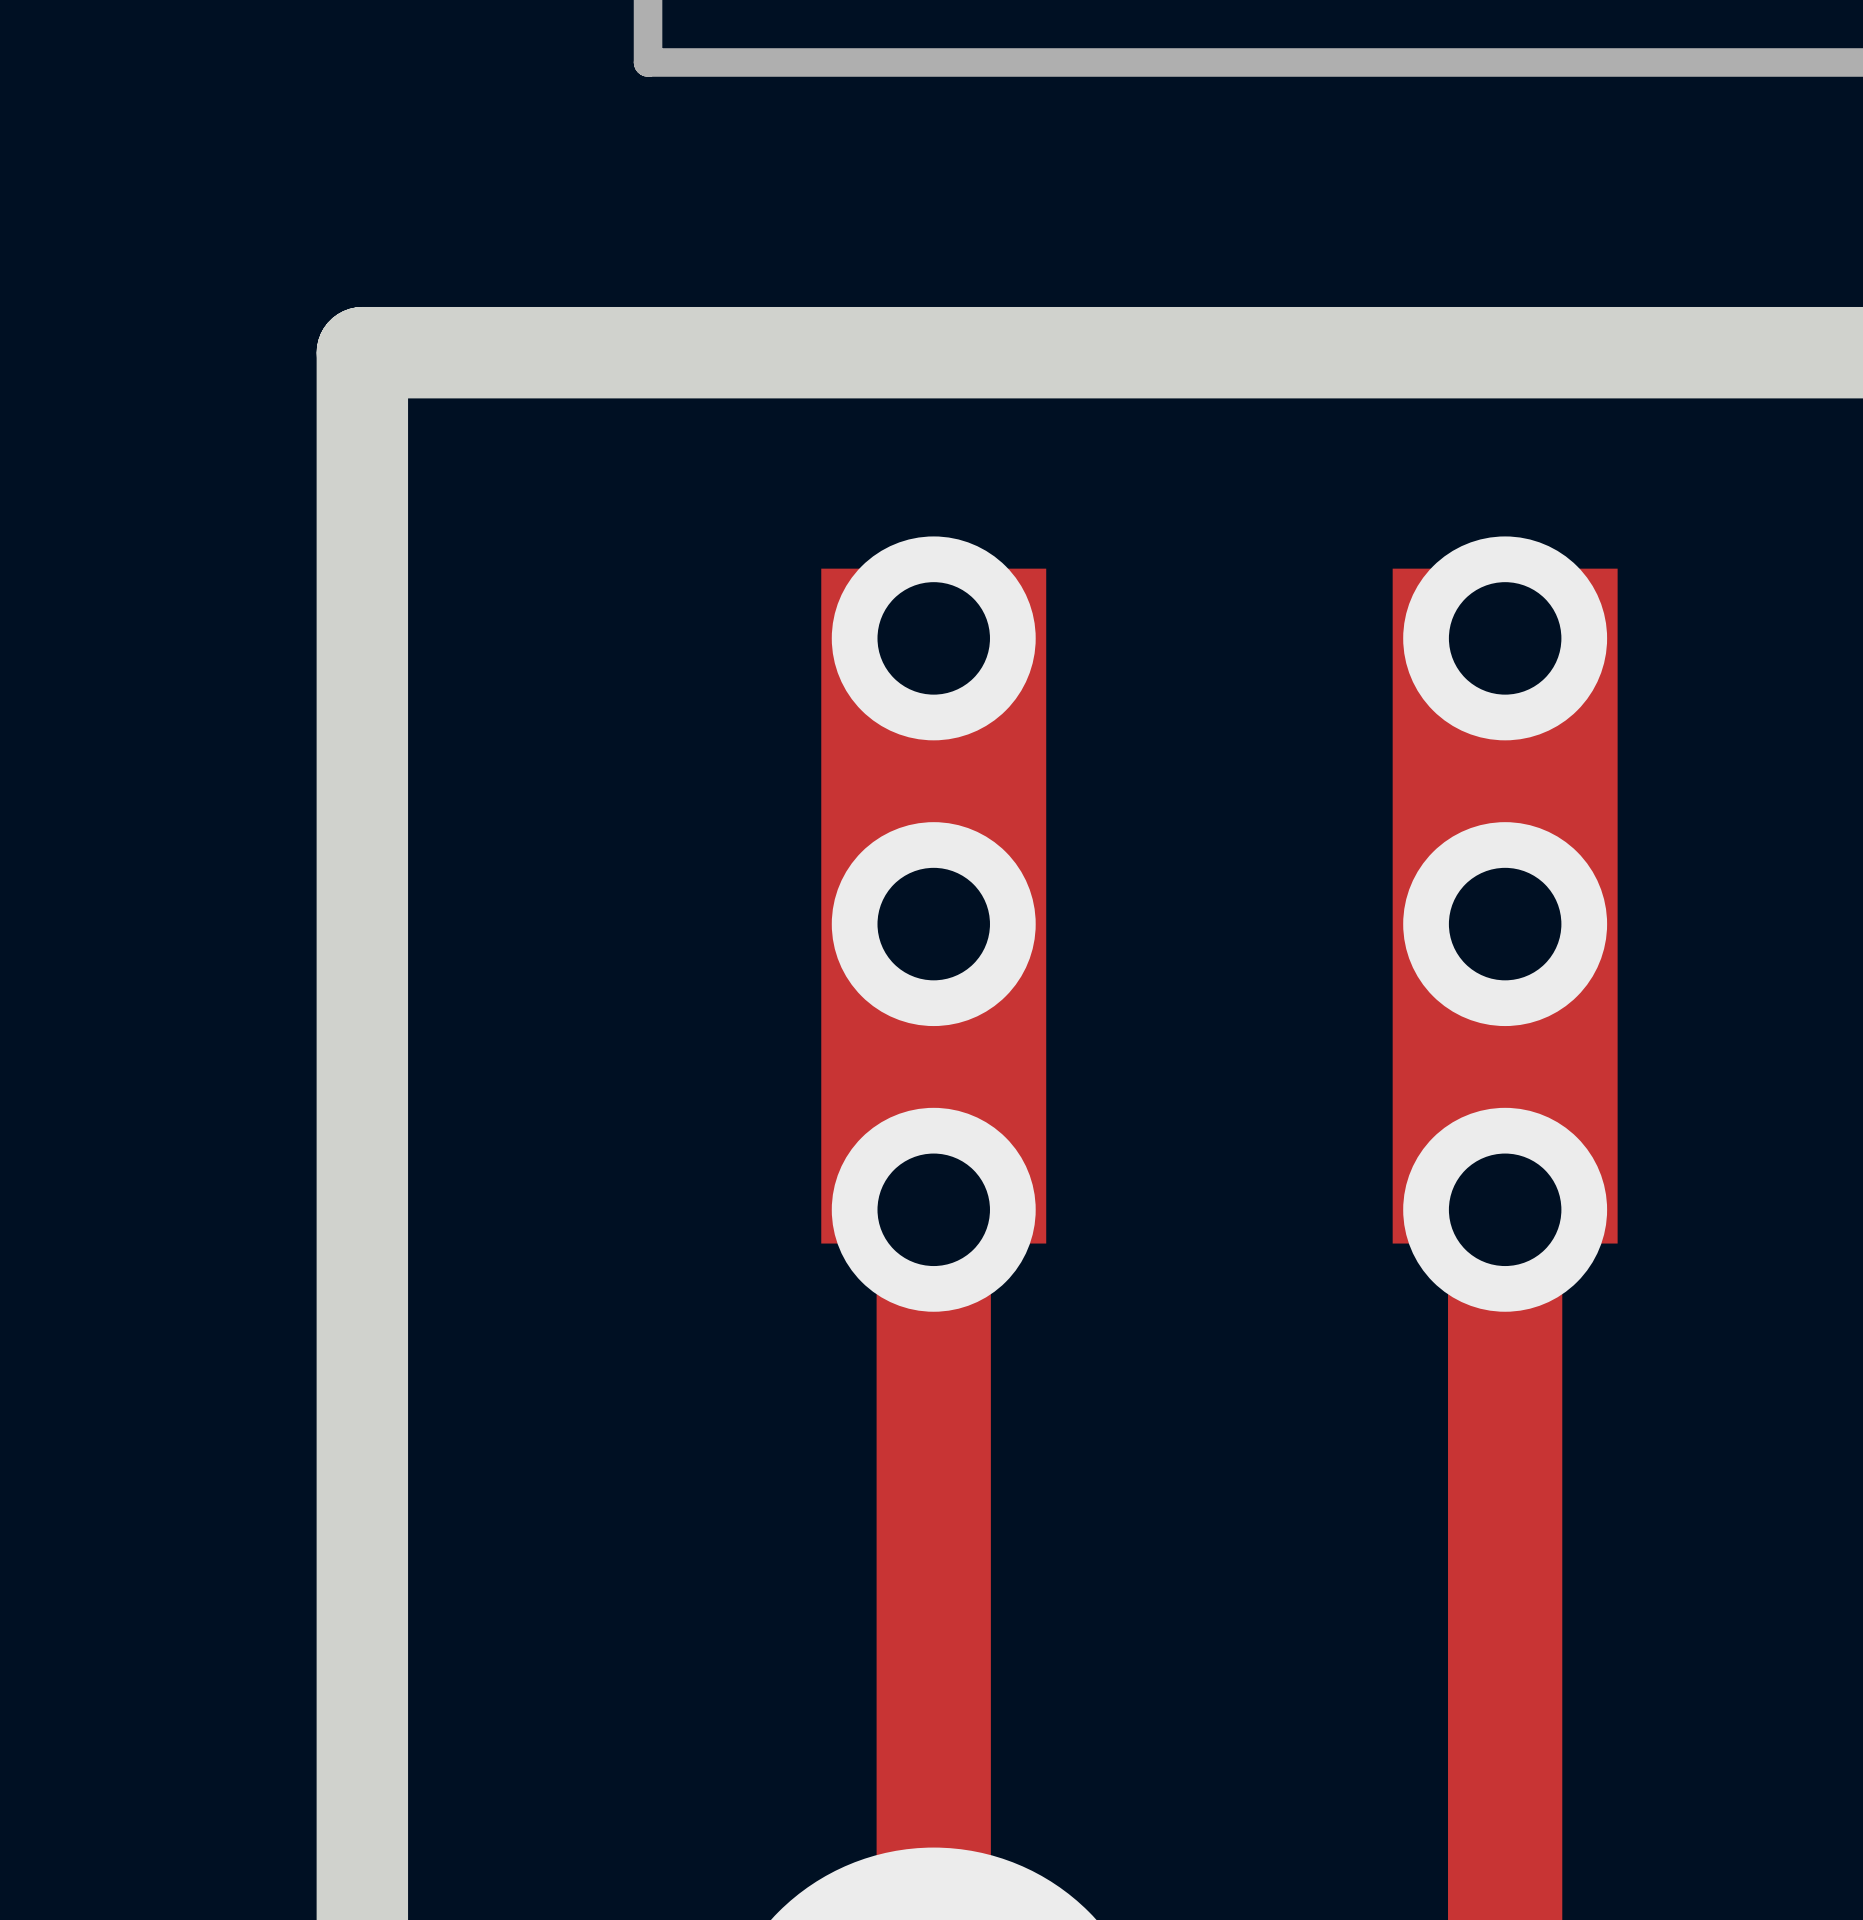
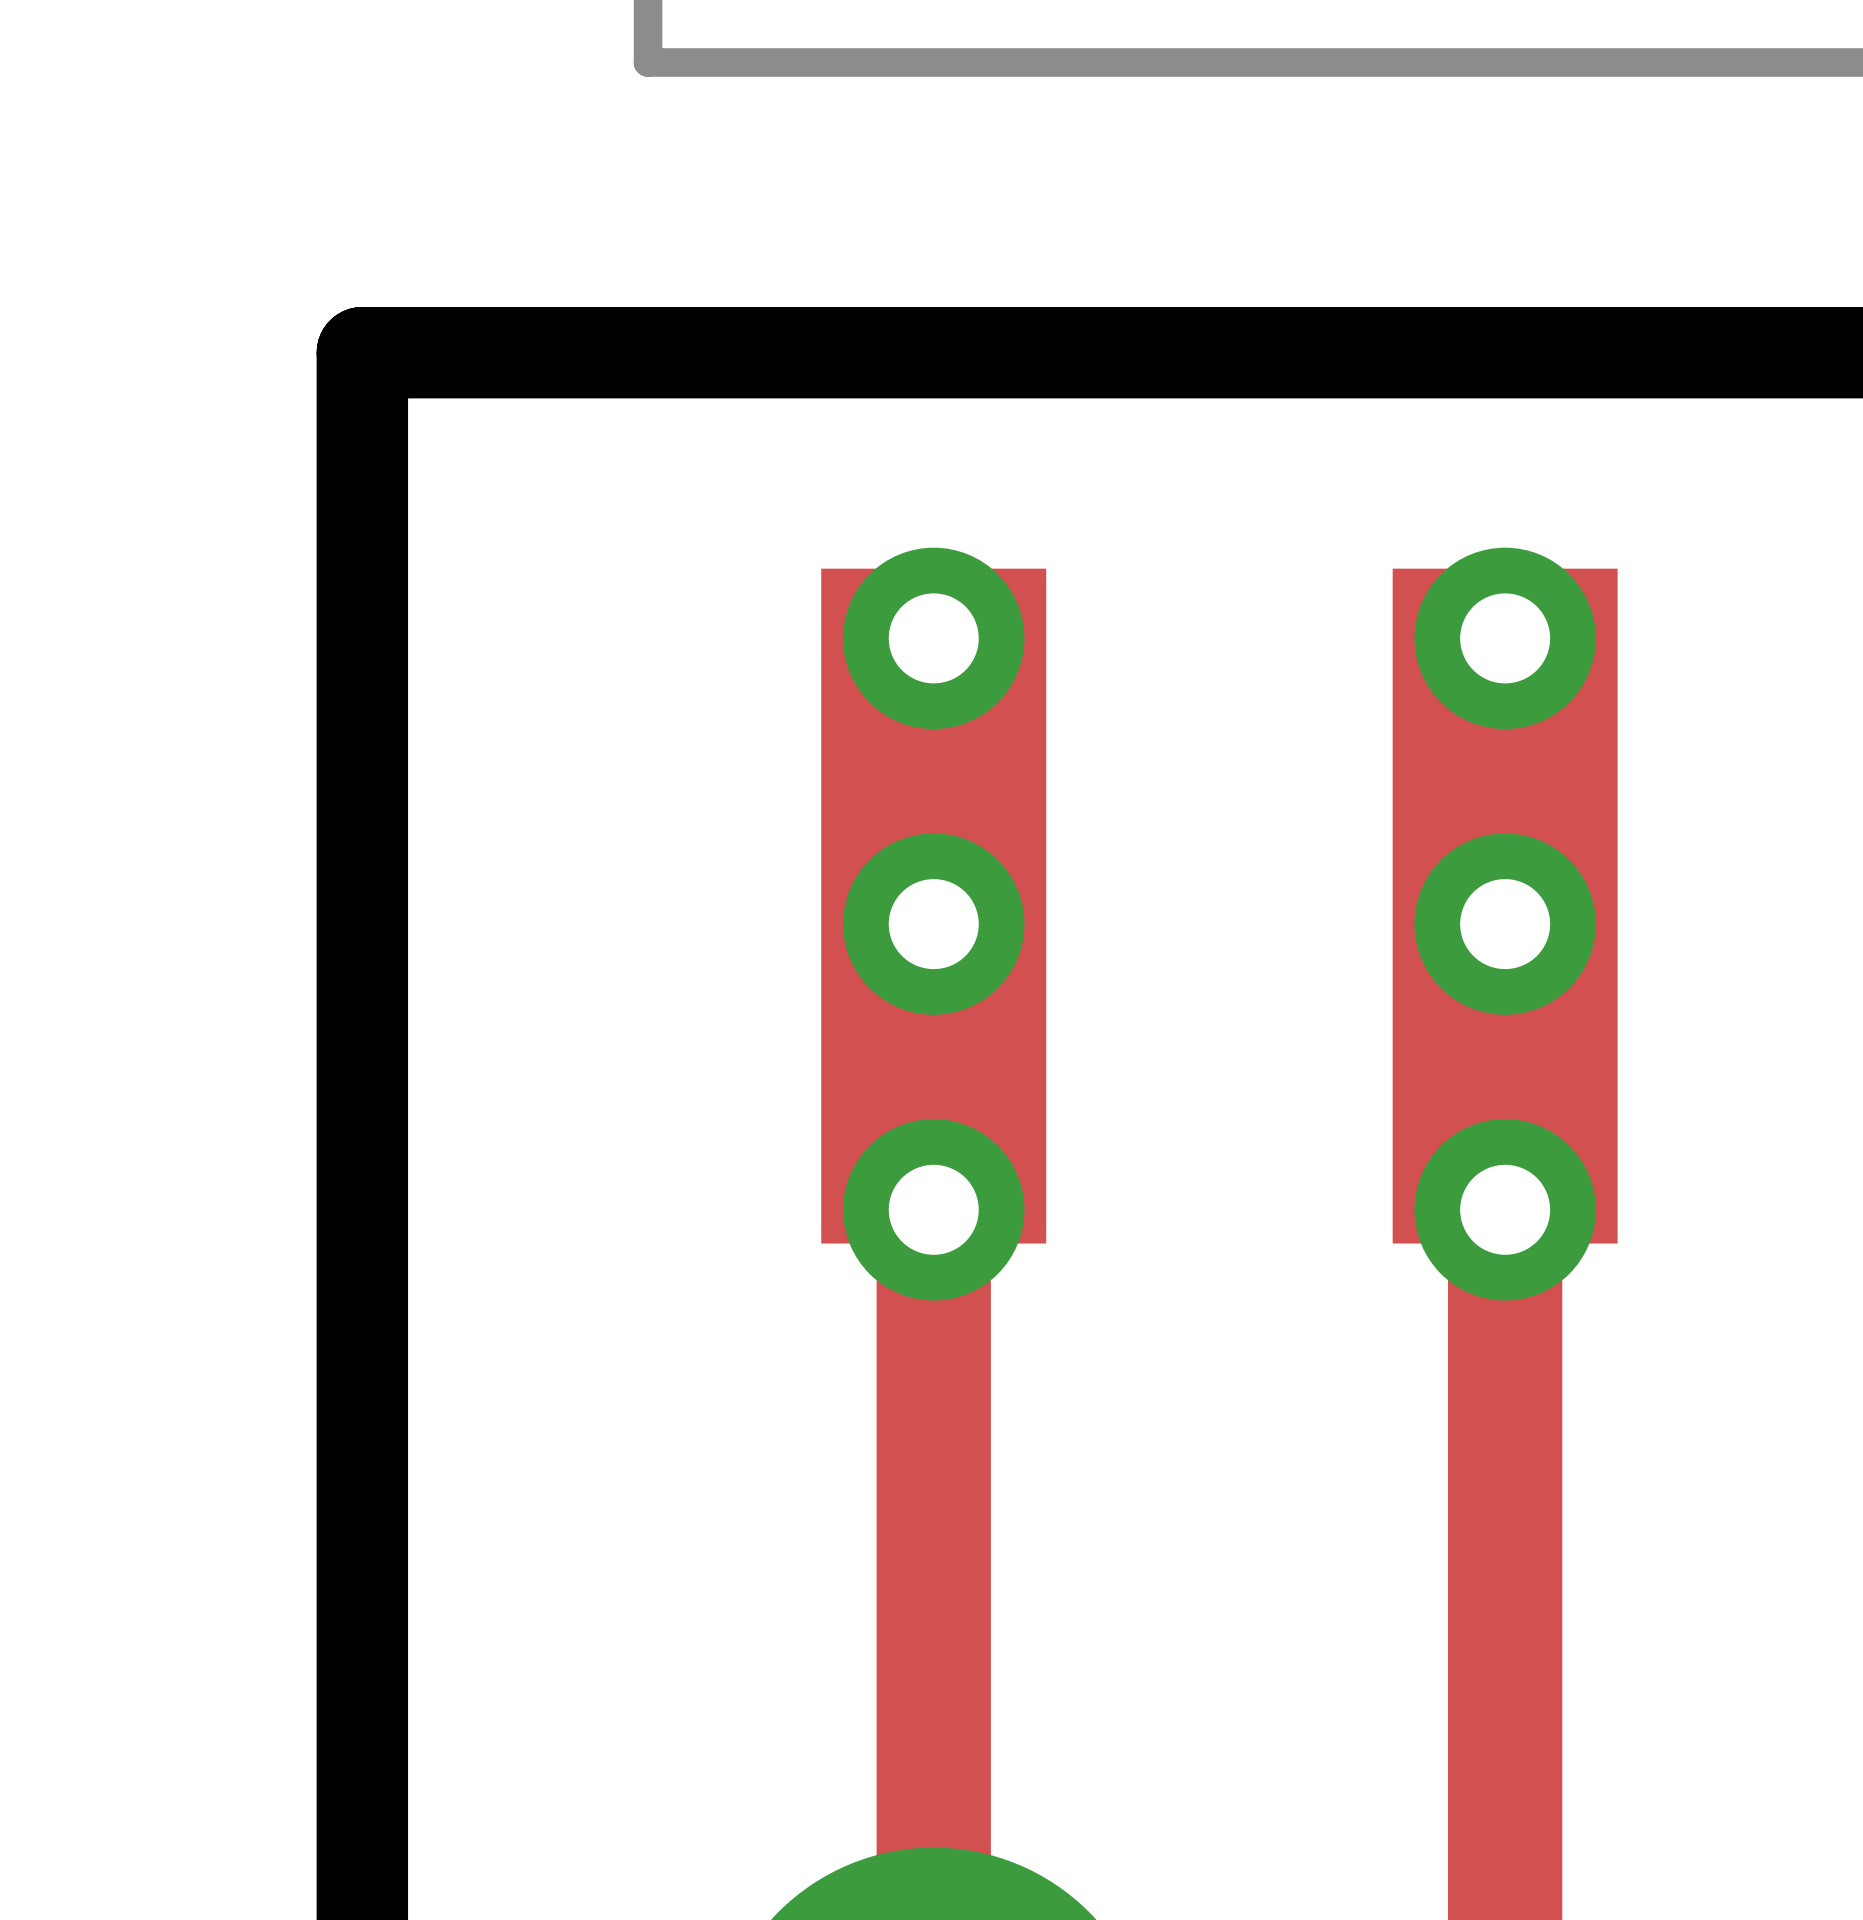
via size: [831, 536, 1036, 741] -> [843, 547, 1025, 730]
via size: [1403, 536, 1608, 741] -> [1414, 547, 1596, 730]
via size: [831, 822, 1036, 1027] -> [843, 833, 1025, 1015]
via size: [1403, 822, 1608, 1027] -> [1414, 833, 1596, 1015]
via size: [831, 1107, 1036, 1312] -> [843, 1119, 1025, 1301]
via size: [1403, 1107, 1608, 1312] -> [1414, 1119, 1596, 1301]

